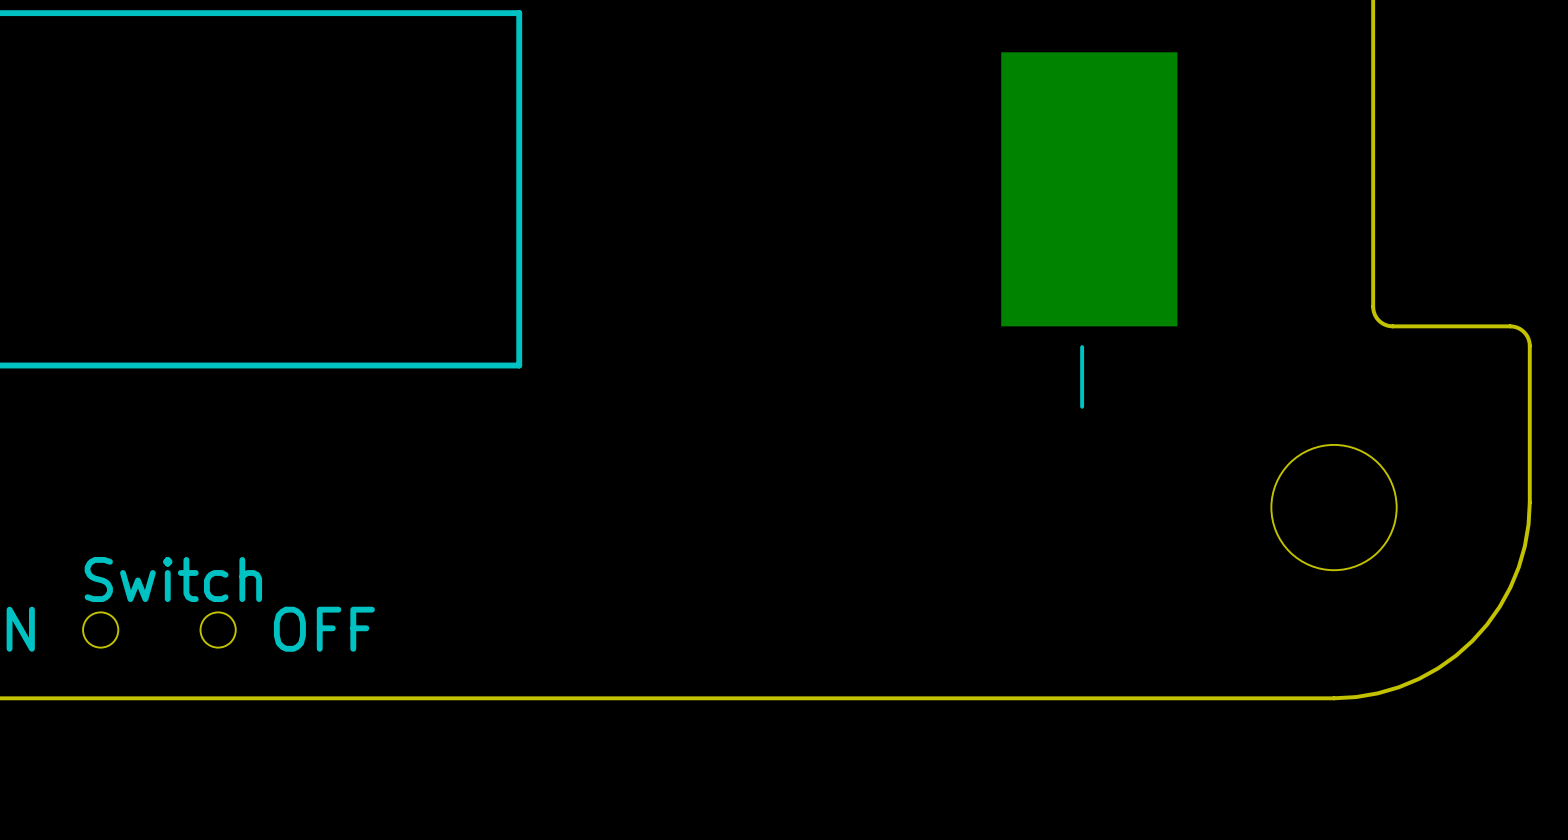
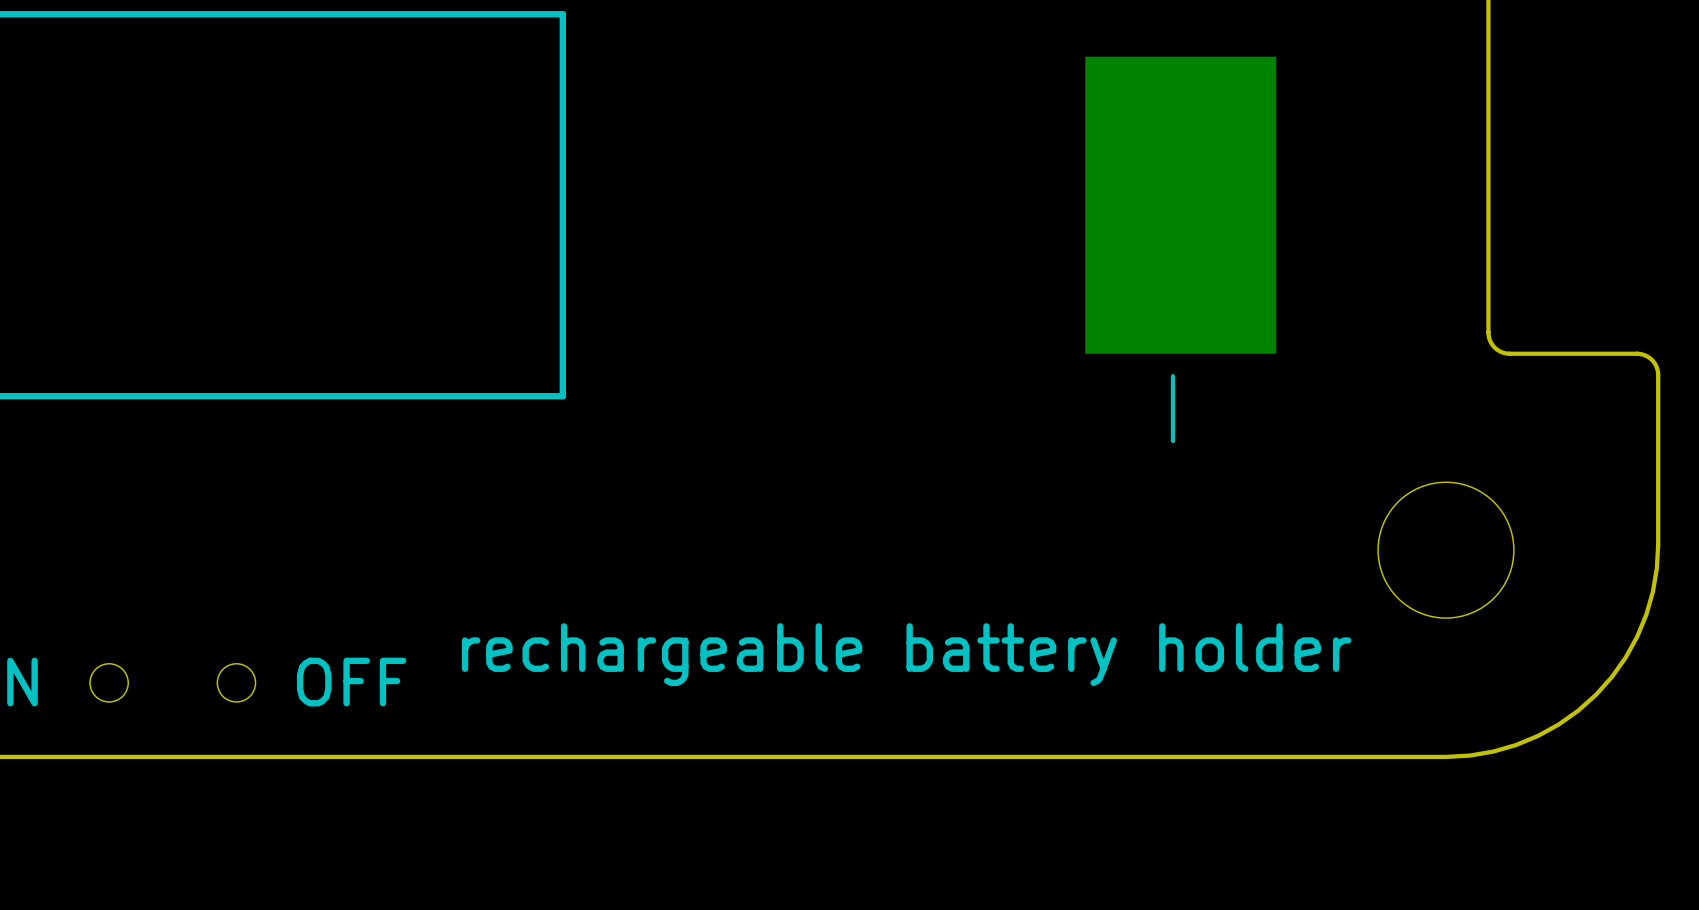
part text: Switch (173, 579) -> none
part text: none -> rechargeable battery holder (906, 654)

